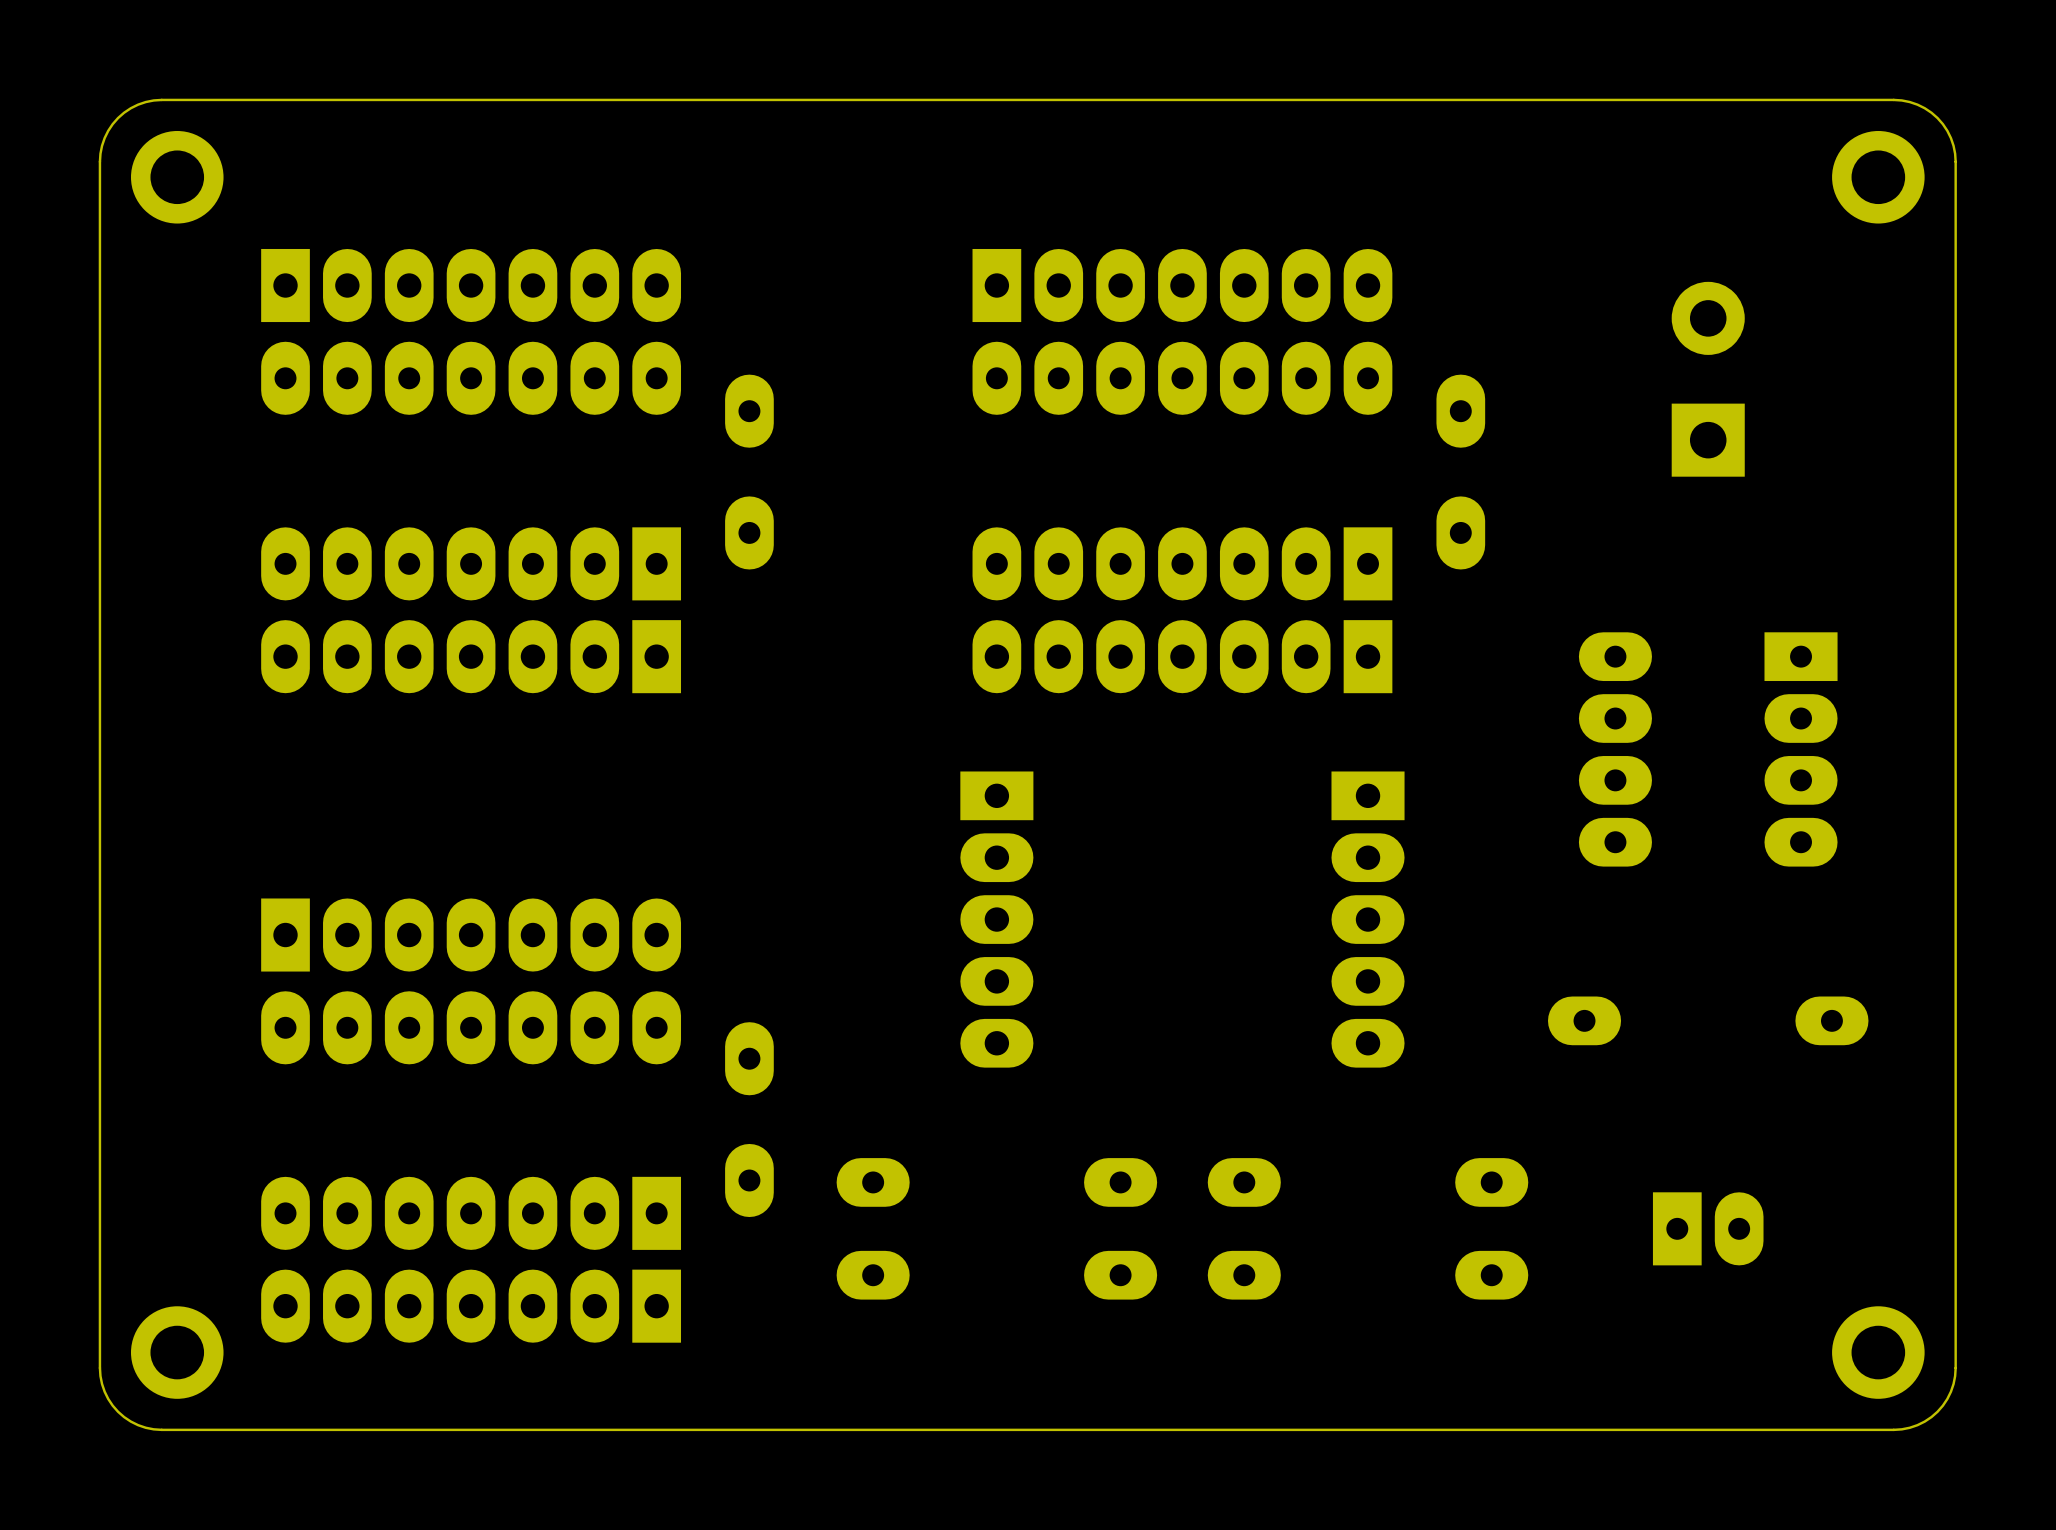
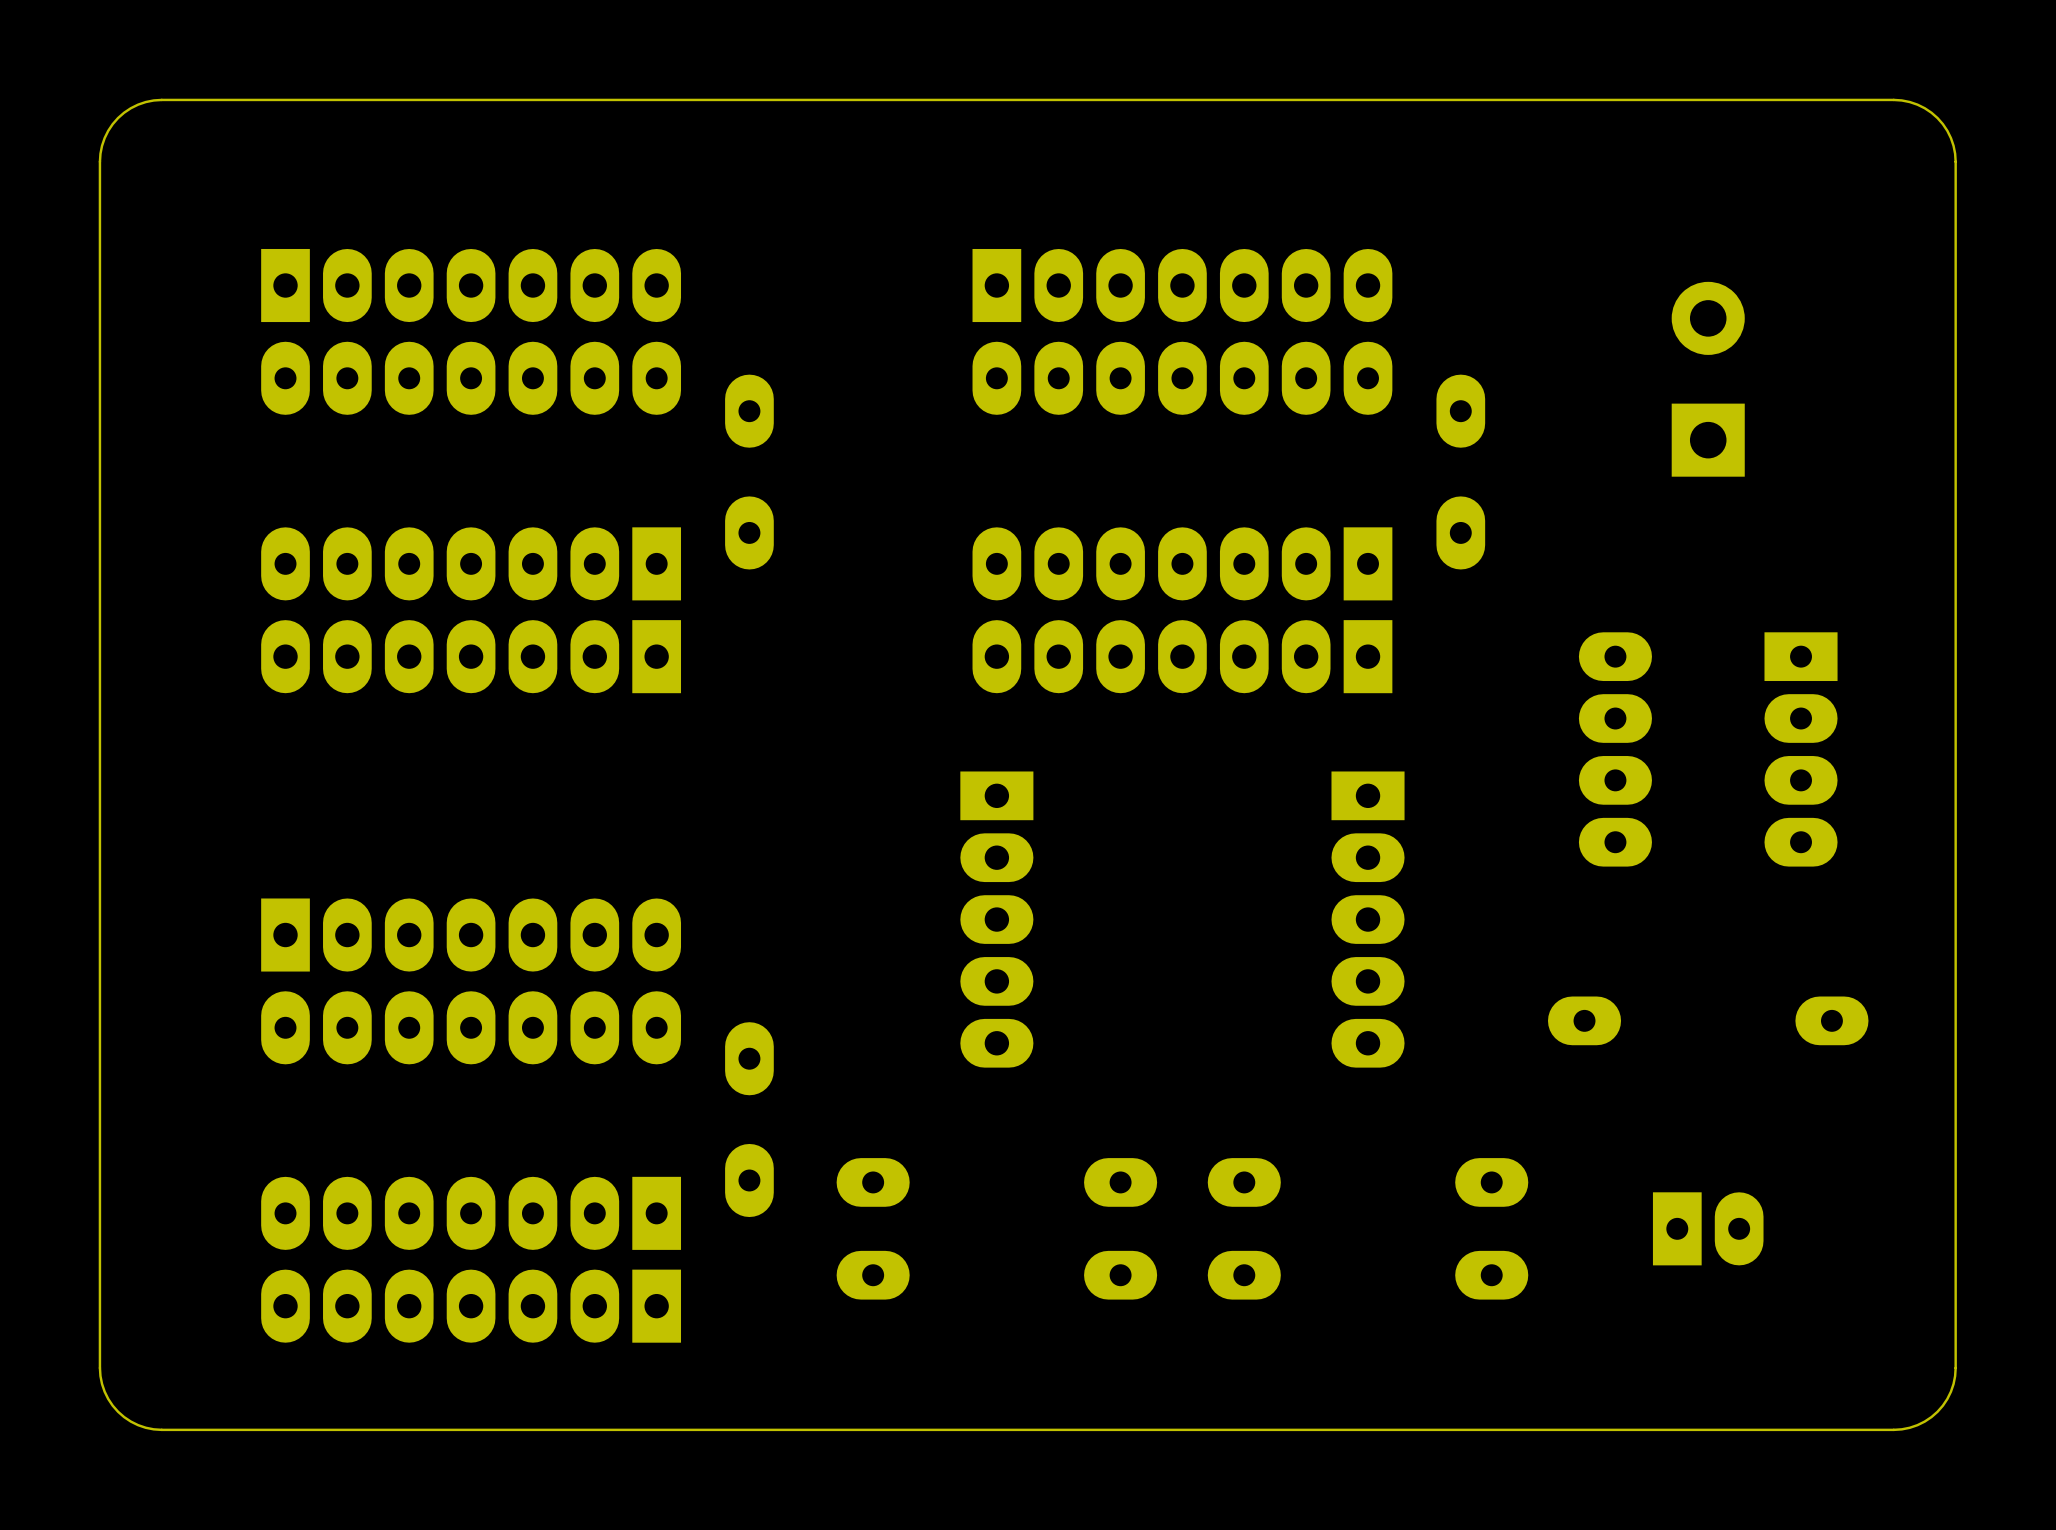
part: (177, 177) -> none
part: (1878, 177) -> none
part: (177, 1352) -> none
part: (1878, 1352) -> none

